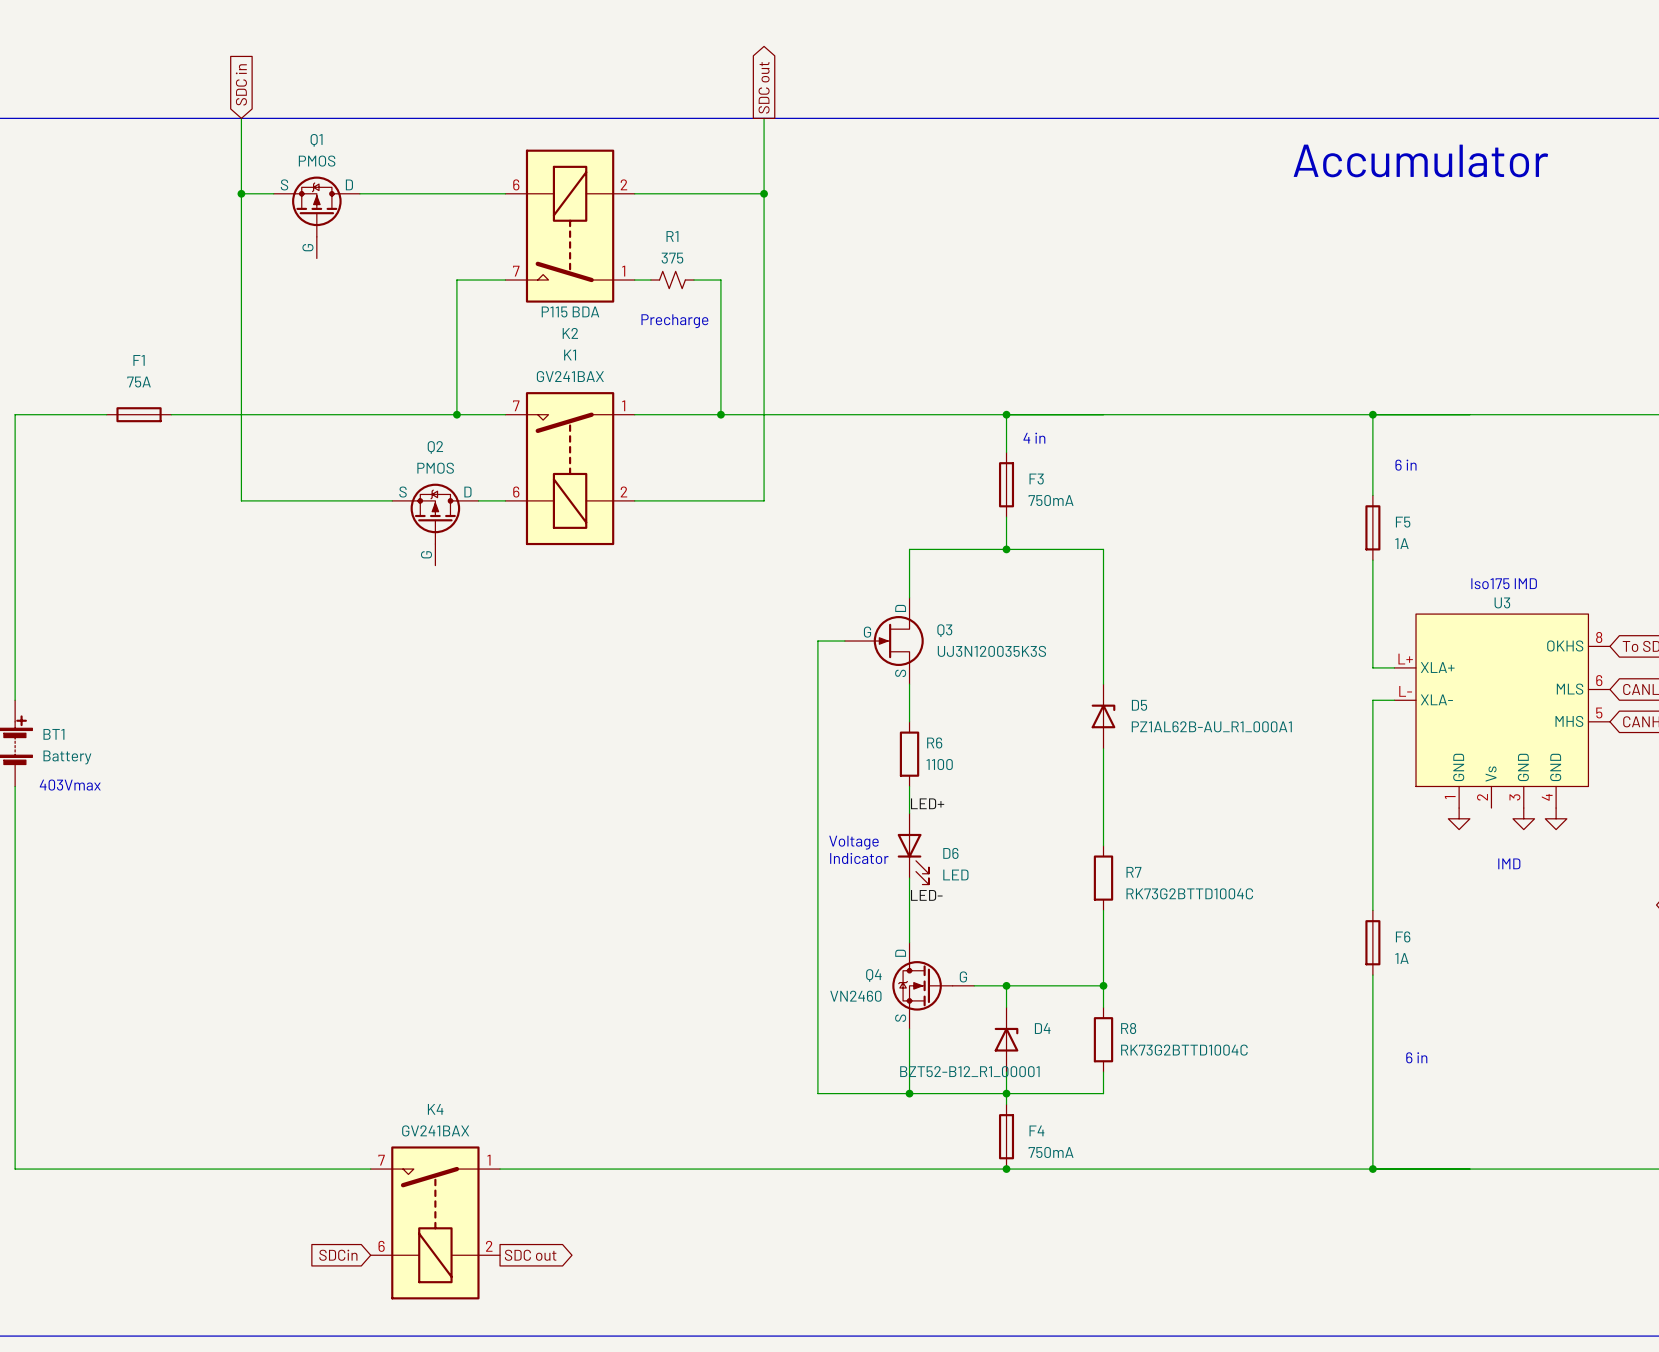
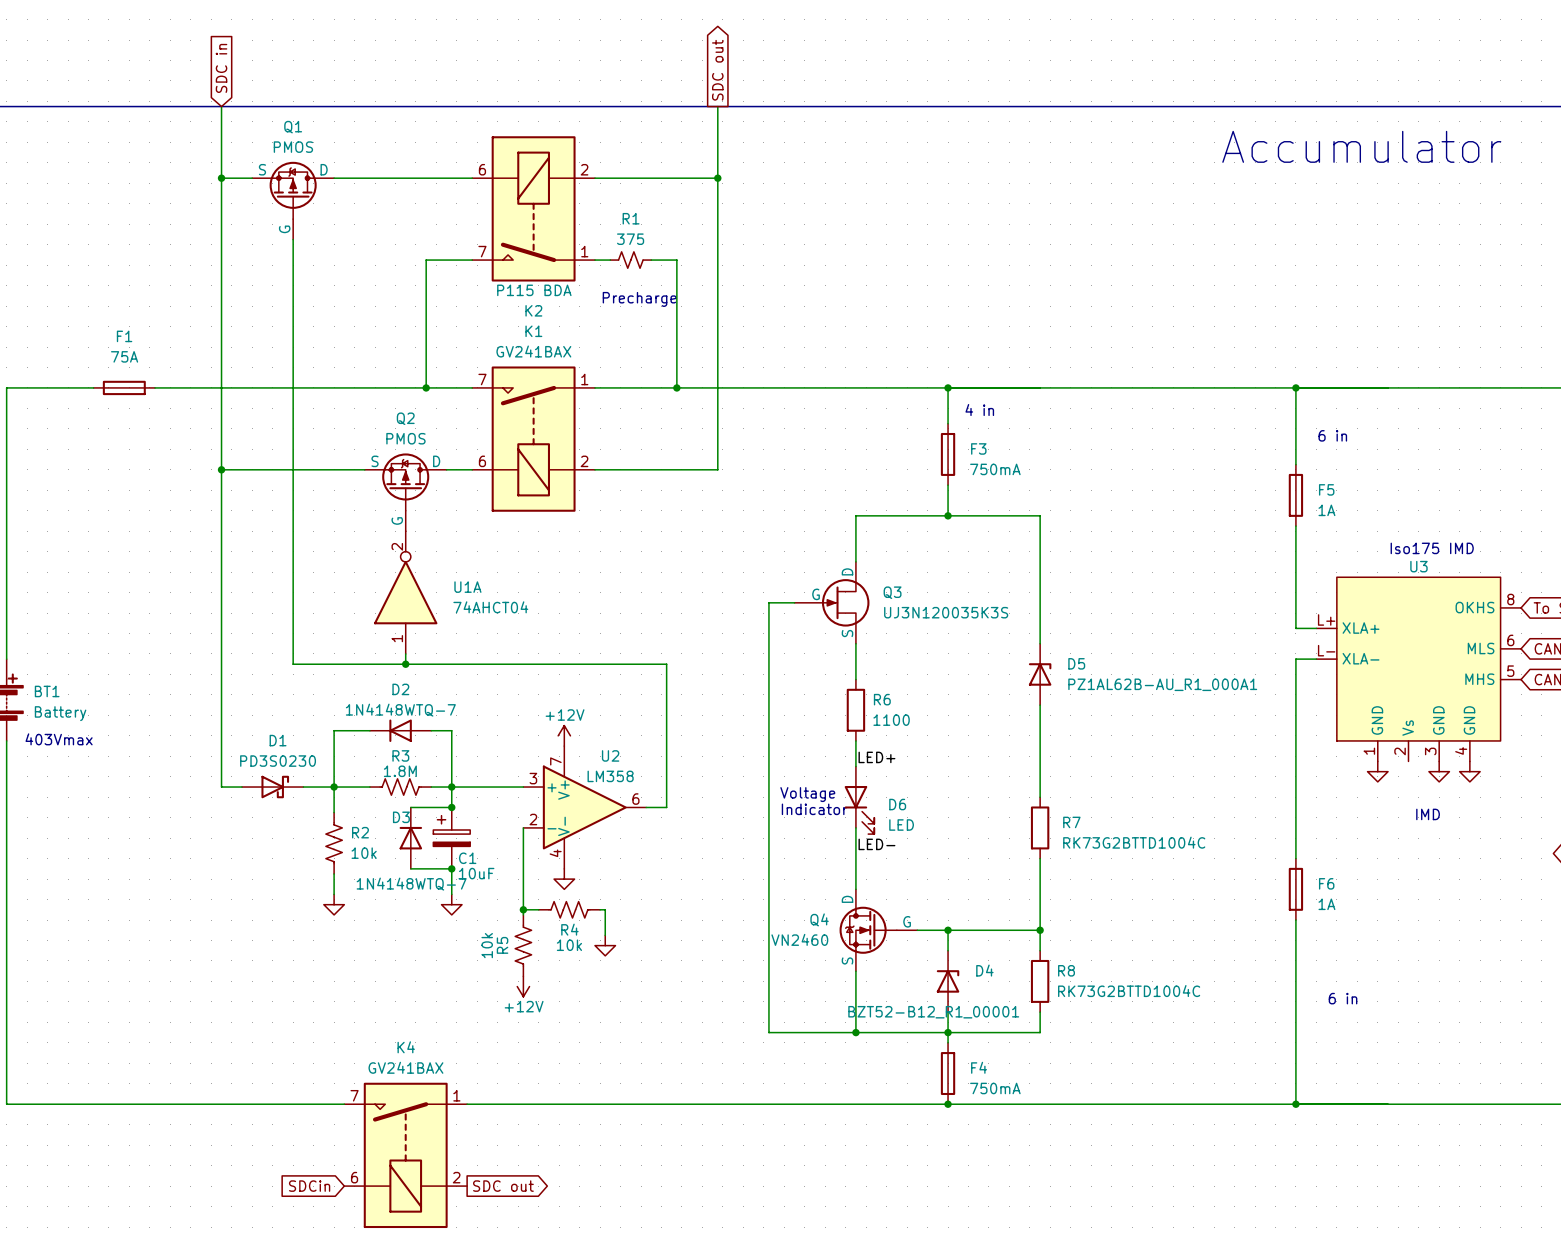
wire: none -> (293, 239) (293, 664) (666, 664) (666, 807) (646, 807)
wire: none -> (221, 469) (221, 787) (241, 787)
junction: none -> (221, 469)
U1A: none -> 74AHCT04 (405, 592)
wire: none -> (405, 653) (405, 664)
junction: none -> (405, 664)
wire: none -> (369, 730) (334, 730) (334, 812)
D2: none -> 1N4148WTQ-7 (400, 730)
wire: none -> (431, 730) (451, 730) (451, 807) (410, 807)
power symbol: none -> +12V (564, 735)
D1: none -> PD3S0230 (272, 787)
wire: none -> (303, 787) (369, 787)
junction: none -> (334, 787)
R3: none -> 1.8M (400, 787)
wire: none -> (431, 787) (523, 787)
junction: none -> (451, 787)
junction: none -> (451, 807)
U2: none -> LM358 (584, 807)
wire: none -> (523, 827) (523, 914)
D3: none -> 1N4148WTQ-7 (410, 838)
C1: none -> 10uF (451, 838)
R2: none -> 10k (334, 843)
wire: none -> (410, 868) (451, 868) (451, 894)
junction: none -> (451, 868)
wire: none -> (334, 873) (334, 894)
power symbol: none -> (564, 879)
power symbol: none -> (334, 904)
power symbol: none -> (451, 904)
wire: none -> (523, 909) (538, 909)
junction: none -> (523, 909)
R4: none -> 10k (569, 909)
wire: none -> (600, 909) (605, 909) (605, 935)
R5: none -> 10k (523, 945)
power symbol: none -> (605, 945)
power symbol: none -> +12V (523, 986)

